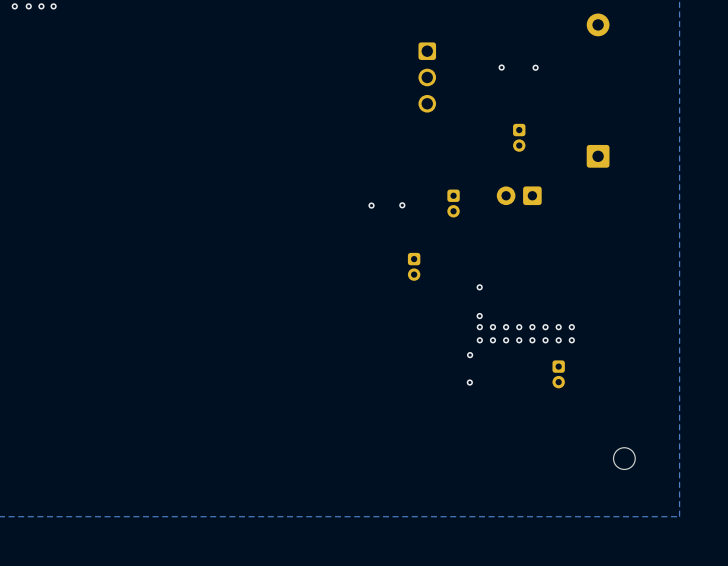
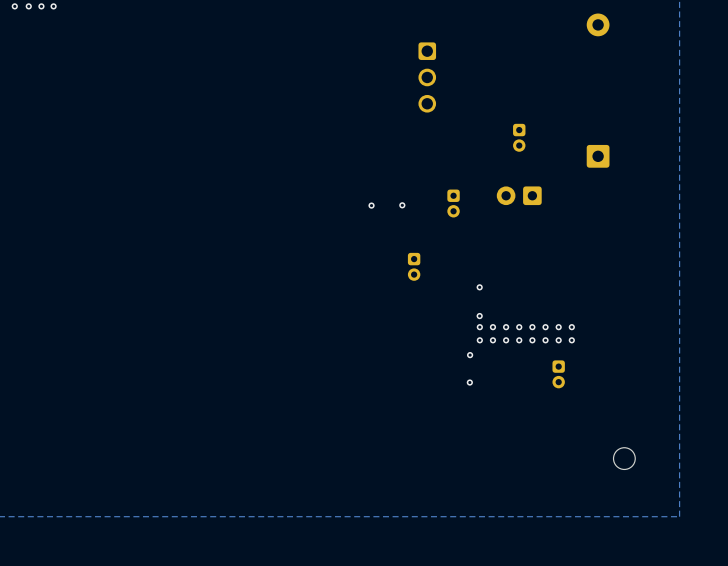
via: (501, 67) -> none
via: (535, 67) -> none

